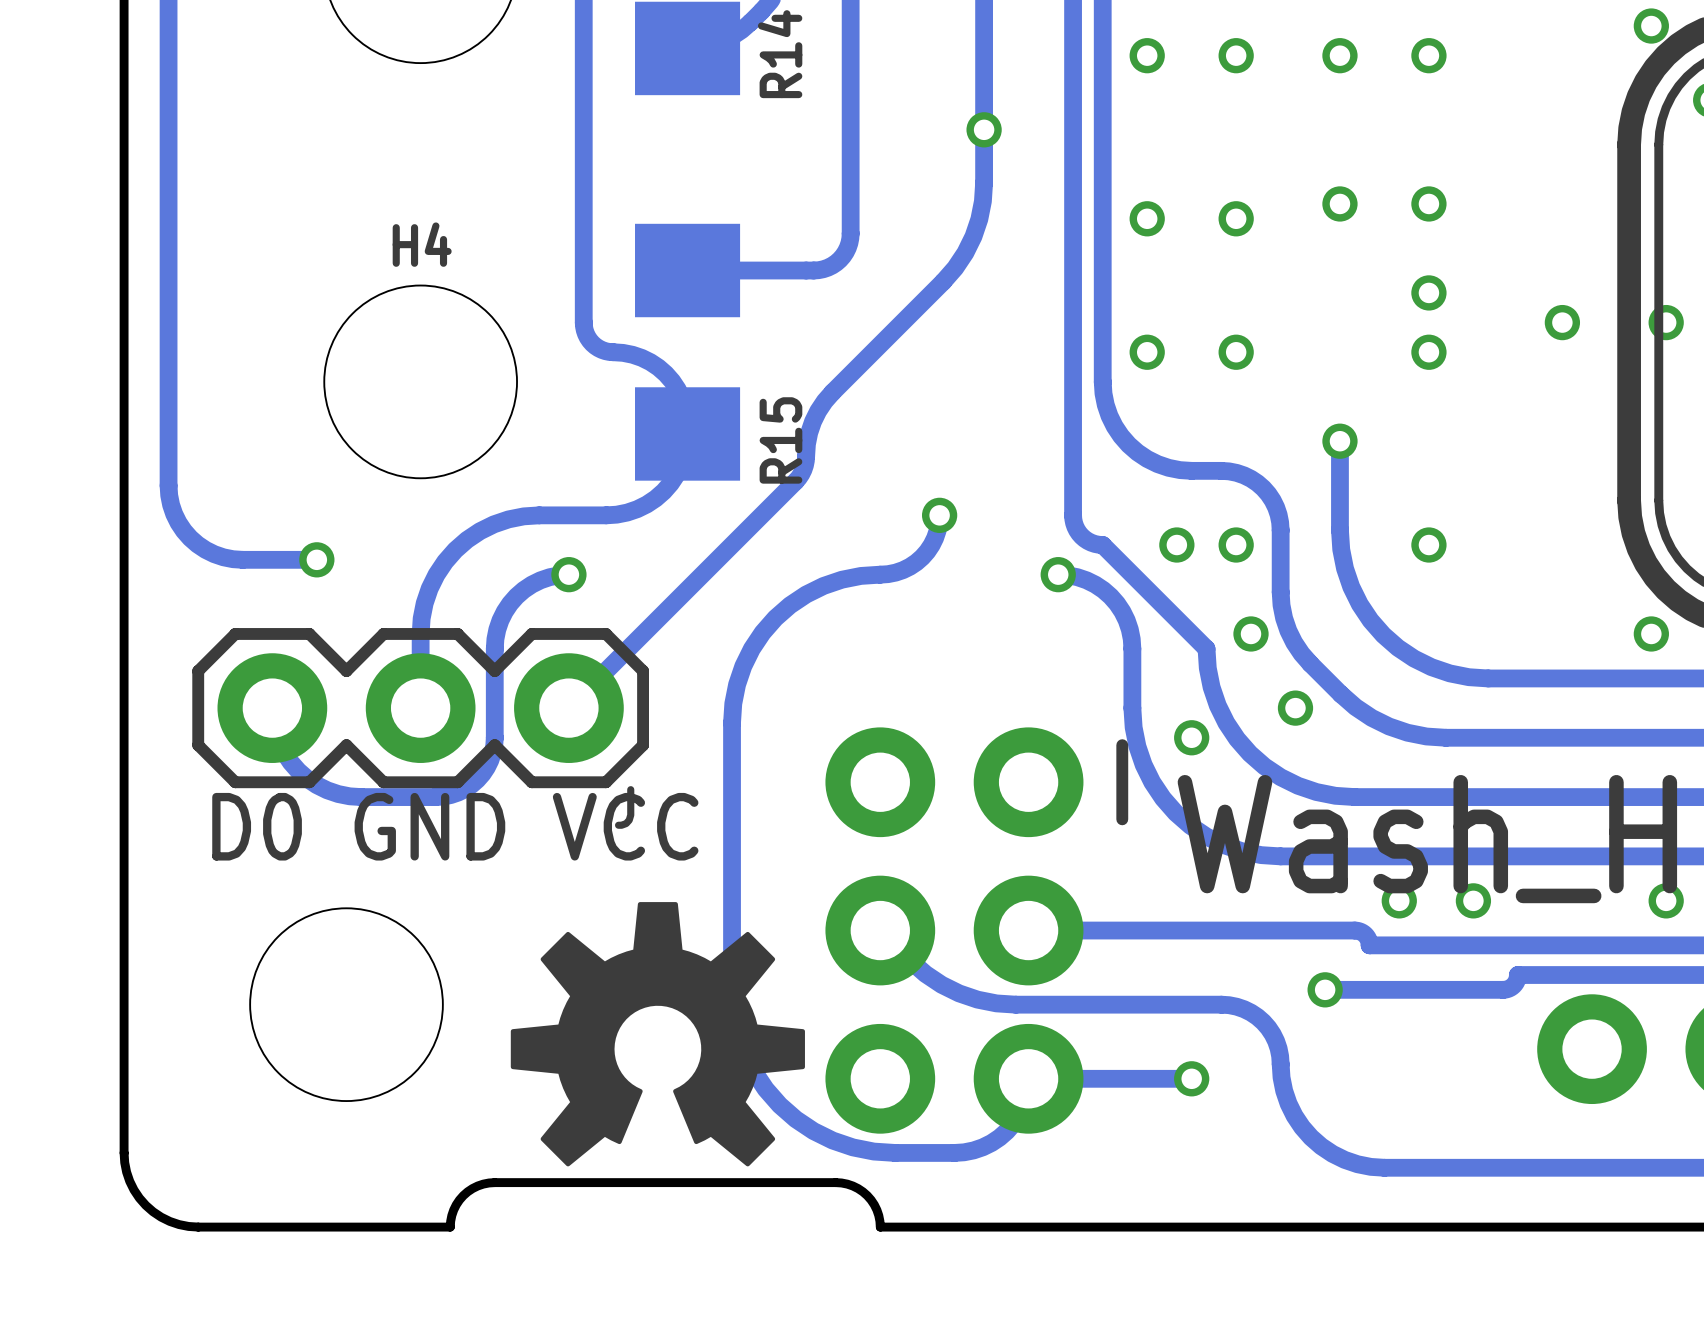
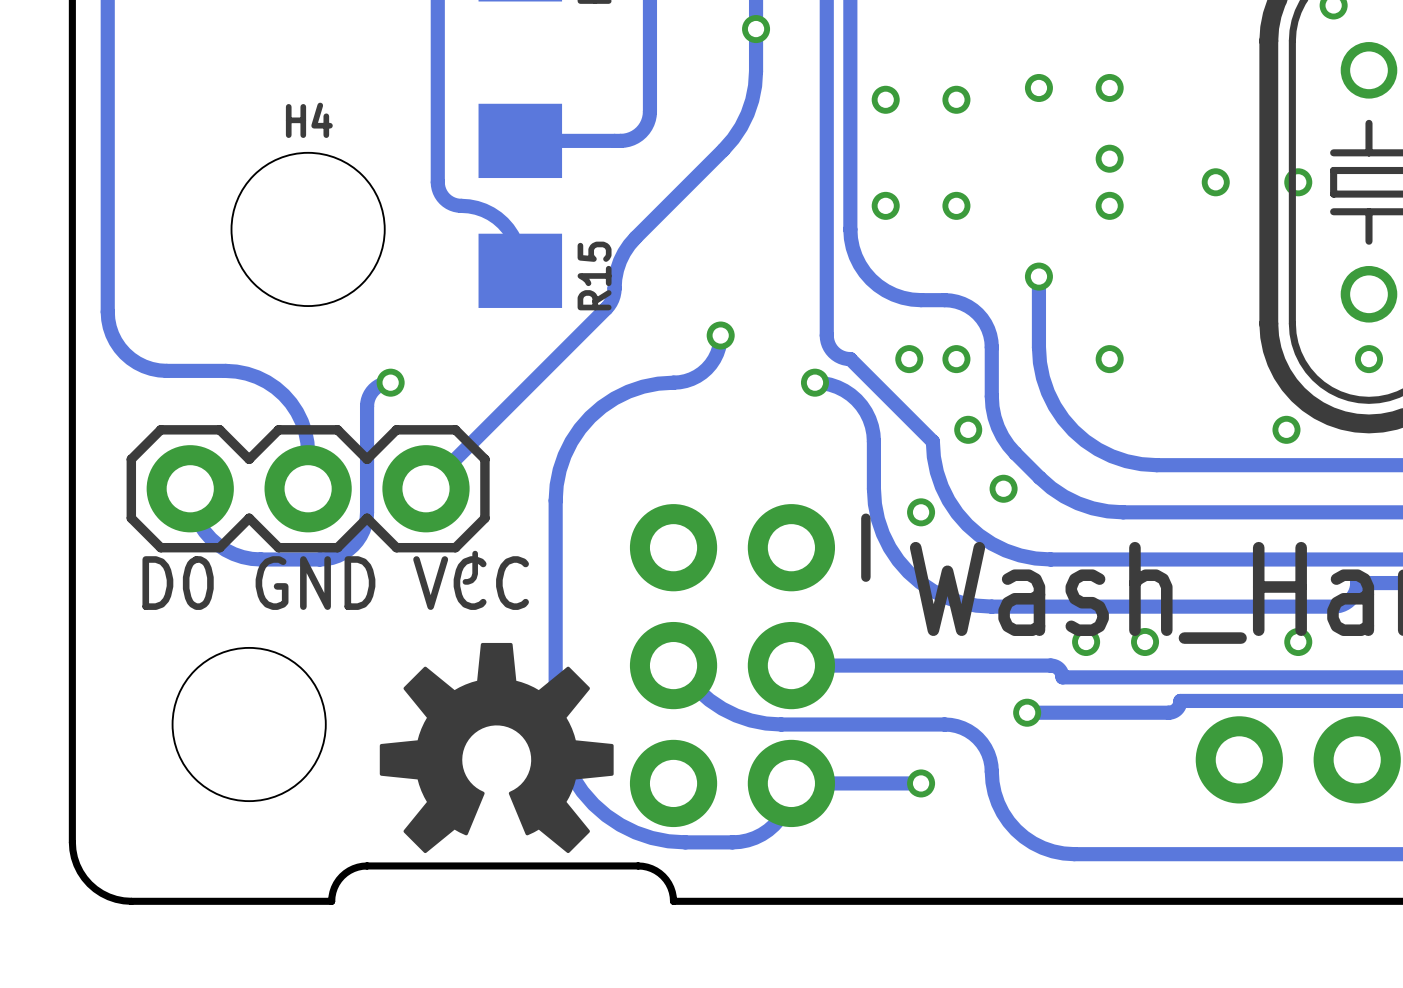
track: (687, 433) (684, 455) (676, 474) (655, 498) (637, 509) (606, 515) (523, 516) (493, 524) (467, 539) (445, 561) (429, 588) (421, 618) (420, 663) -> (225, 370) (257, 377) (283, 395) (301, 421) (308, 453)
via: (316, 559) -> none
track: (568, 574) (540, 580) (516, 596) (500, 620) (494, 648) -> (390, 382) (376, 387) (368, 397) (367, 441)
via position: (568, 574) -> (390, 382)

